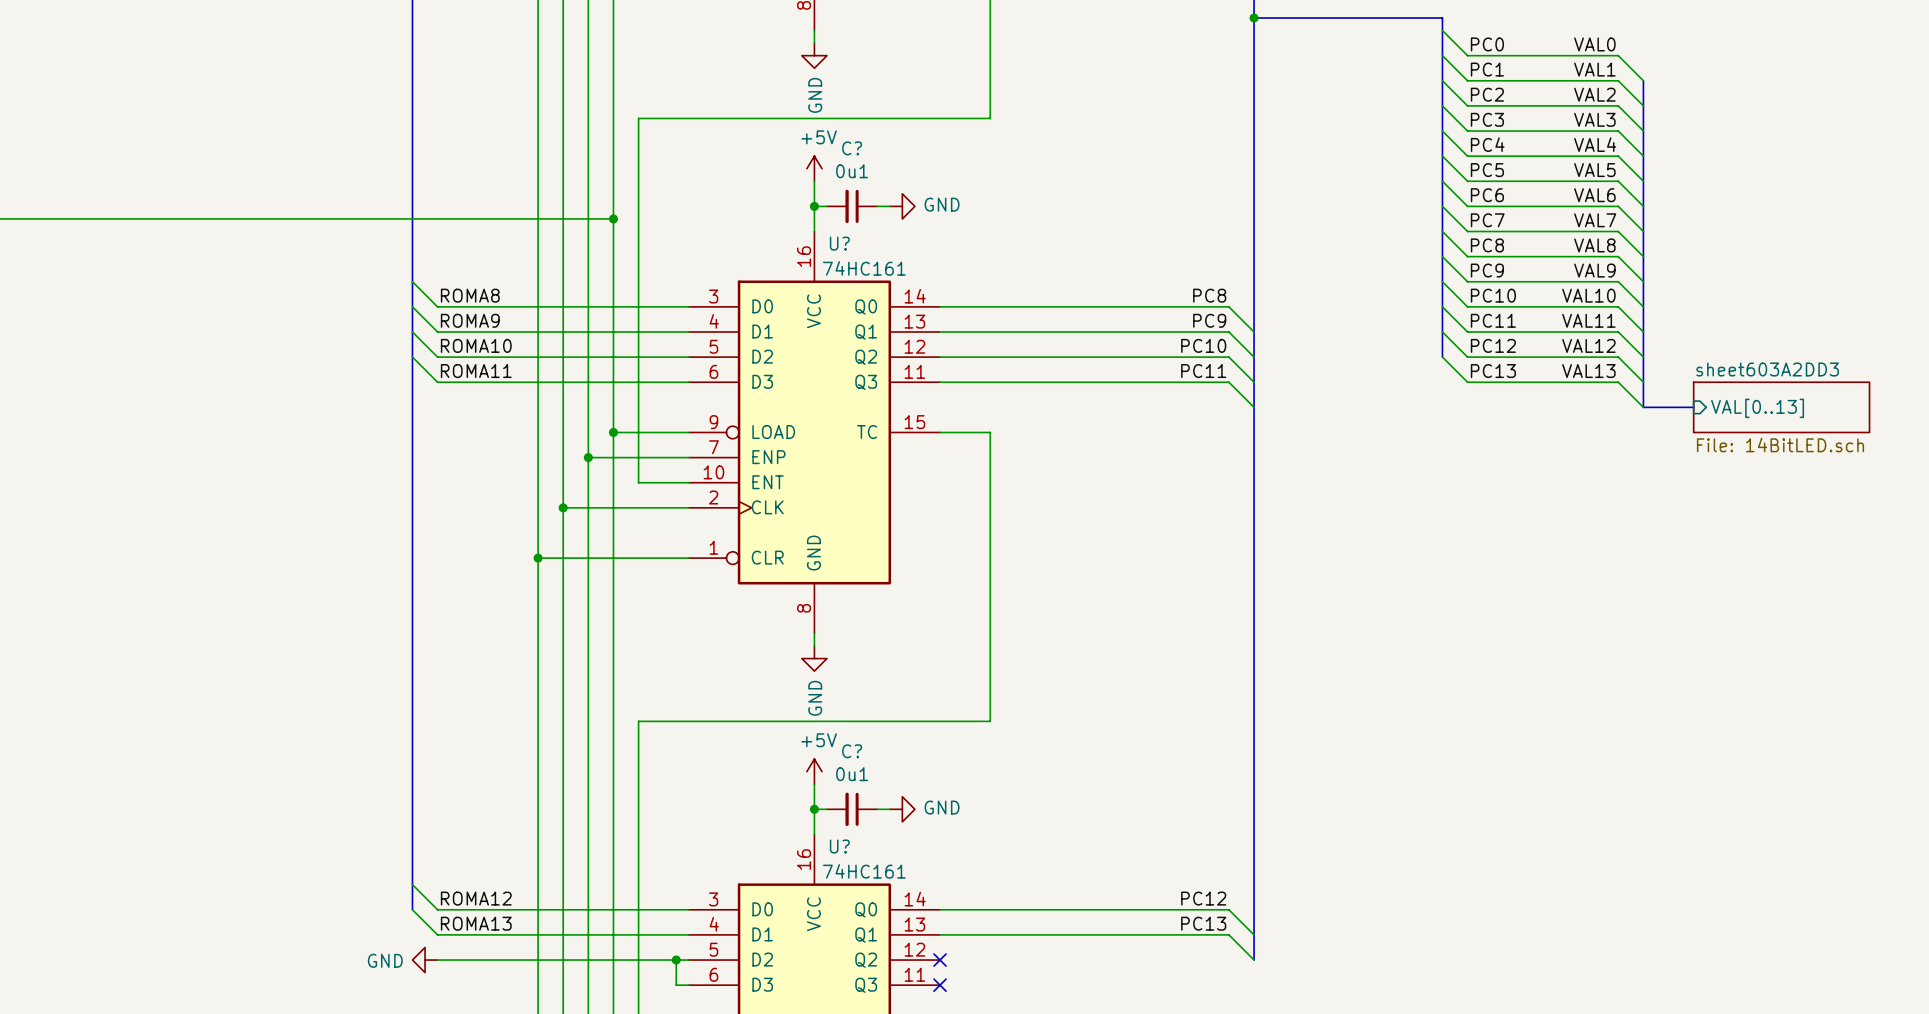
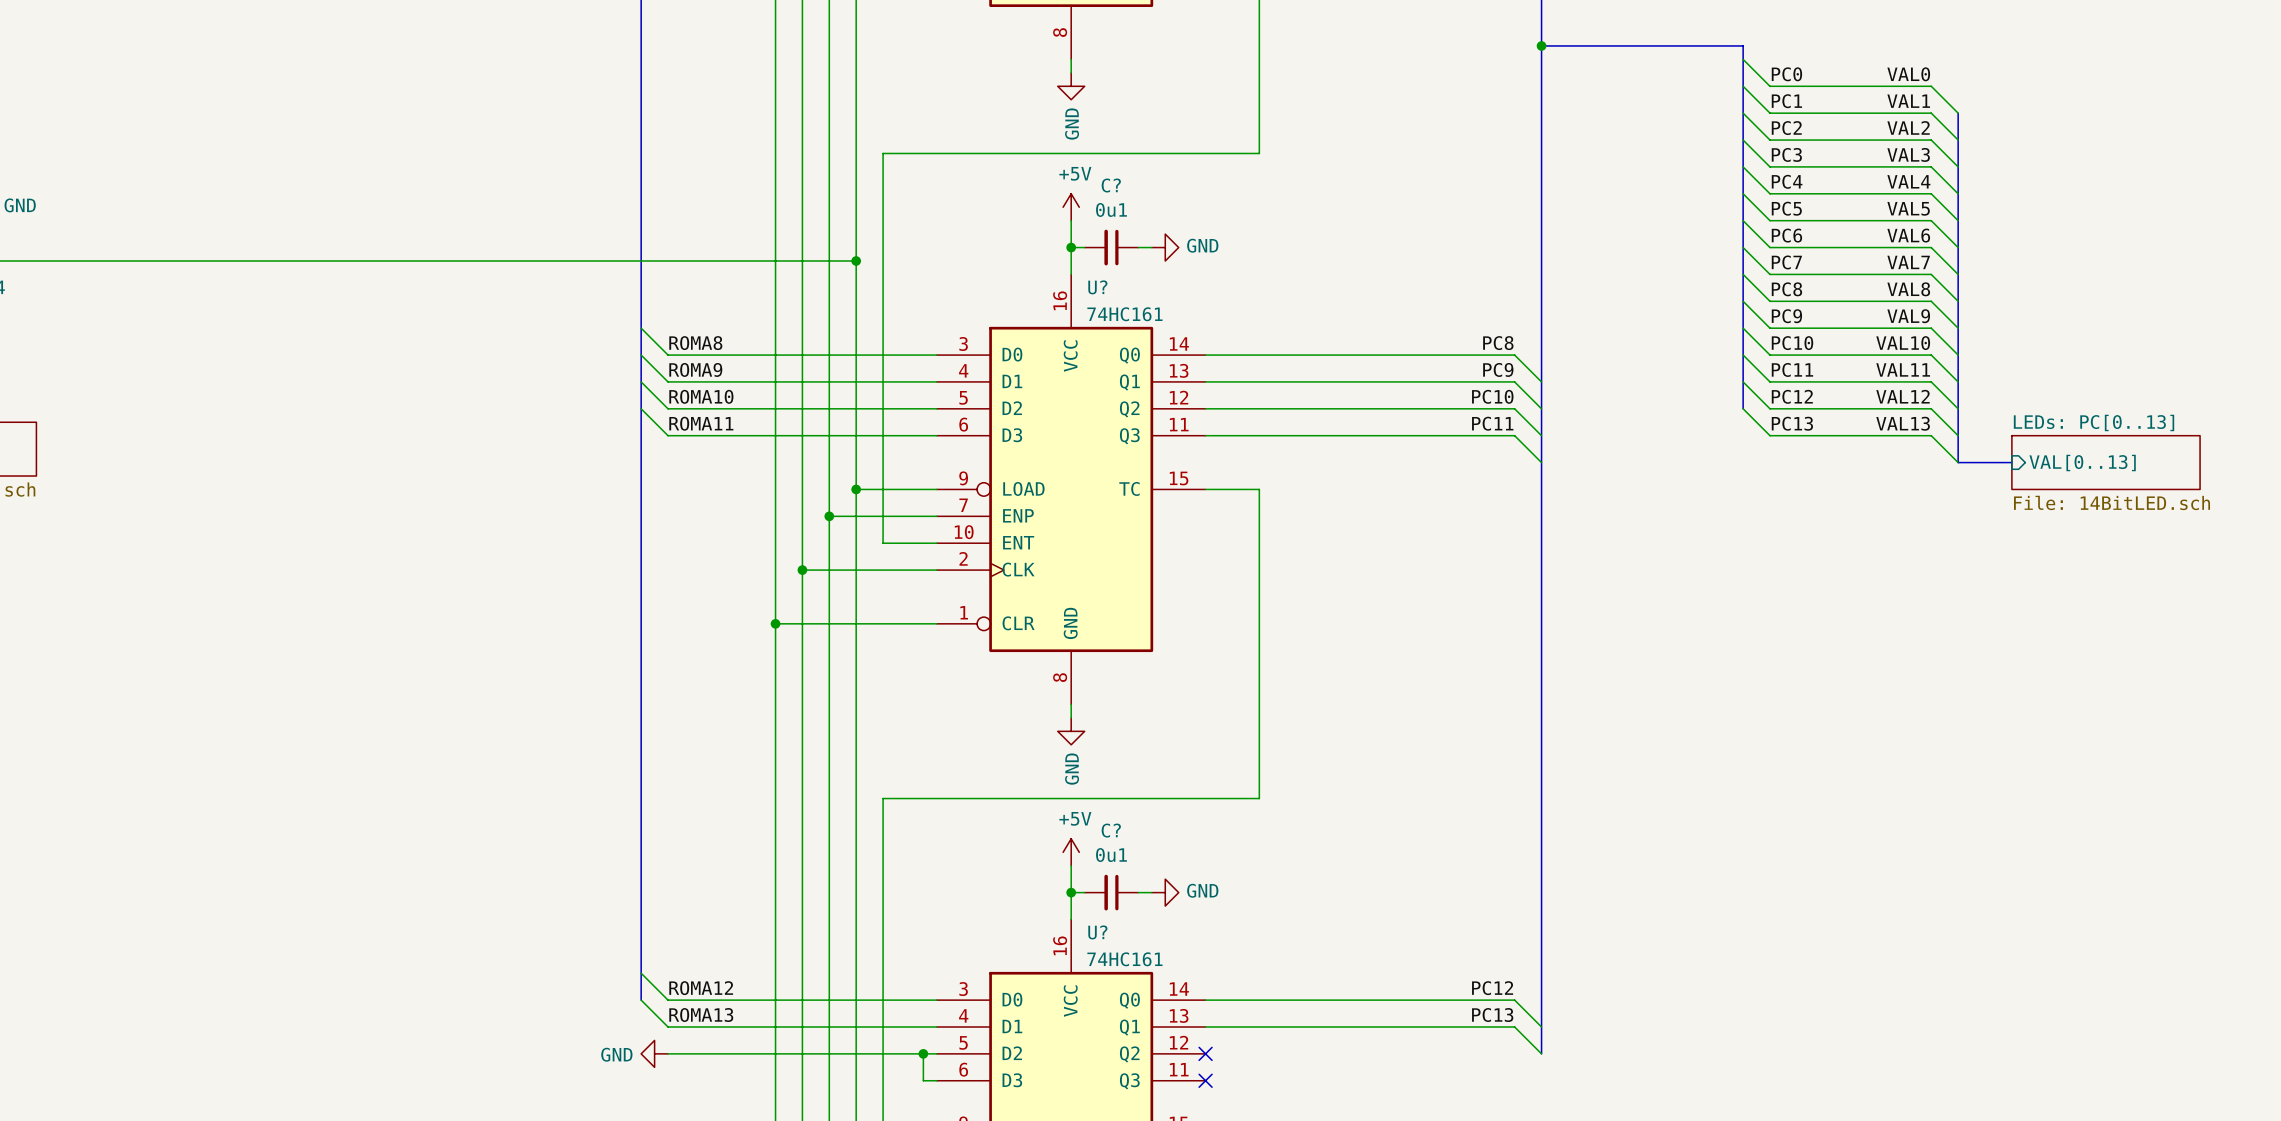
sheet sheet603A2DD3 name: sheet603A2DD3 (1767, 369) -> LEDs: PC[0..13] (2094, 422)

